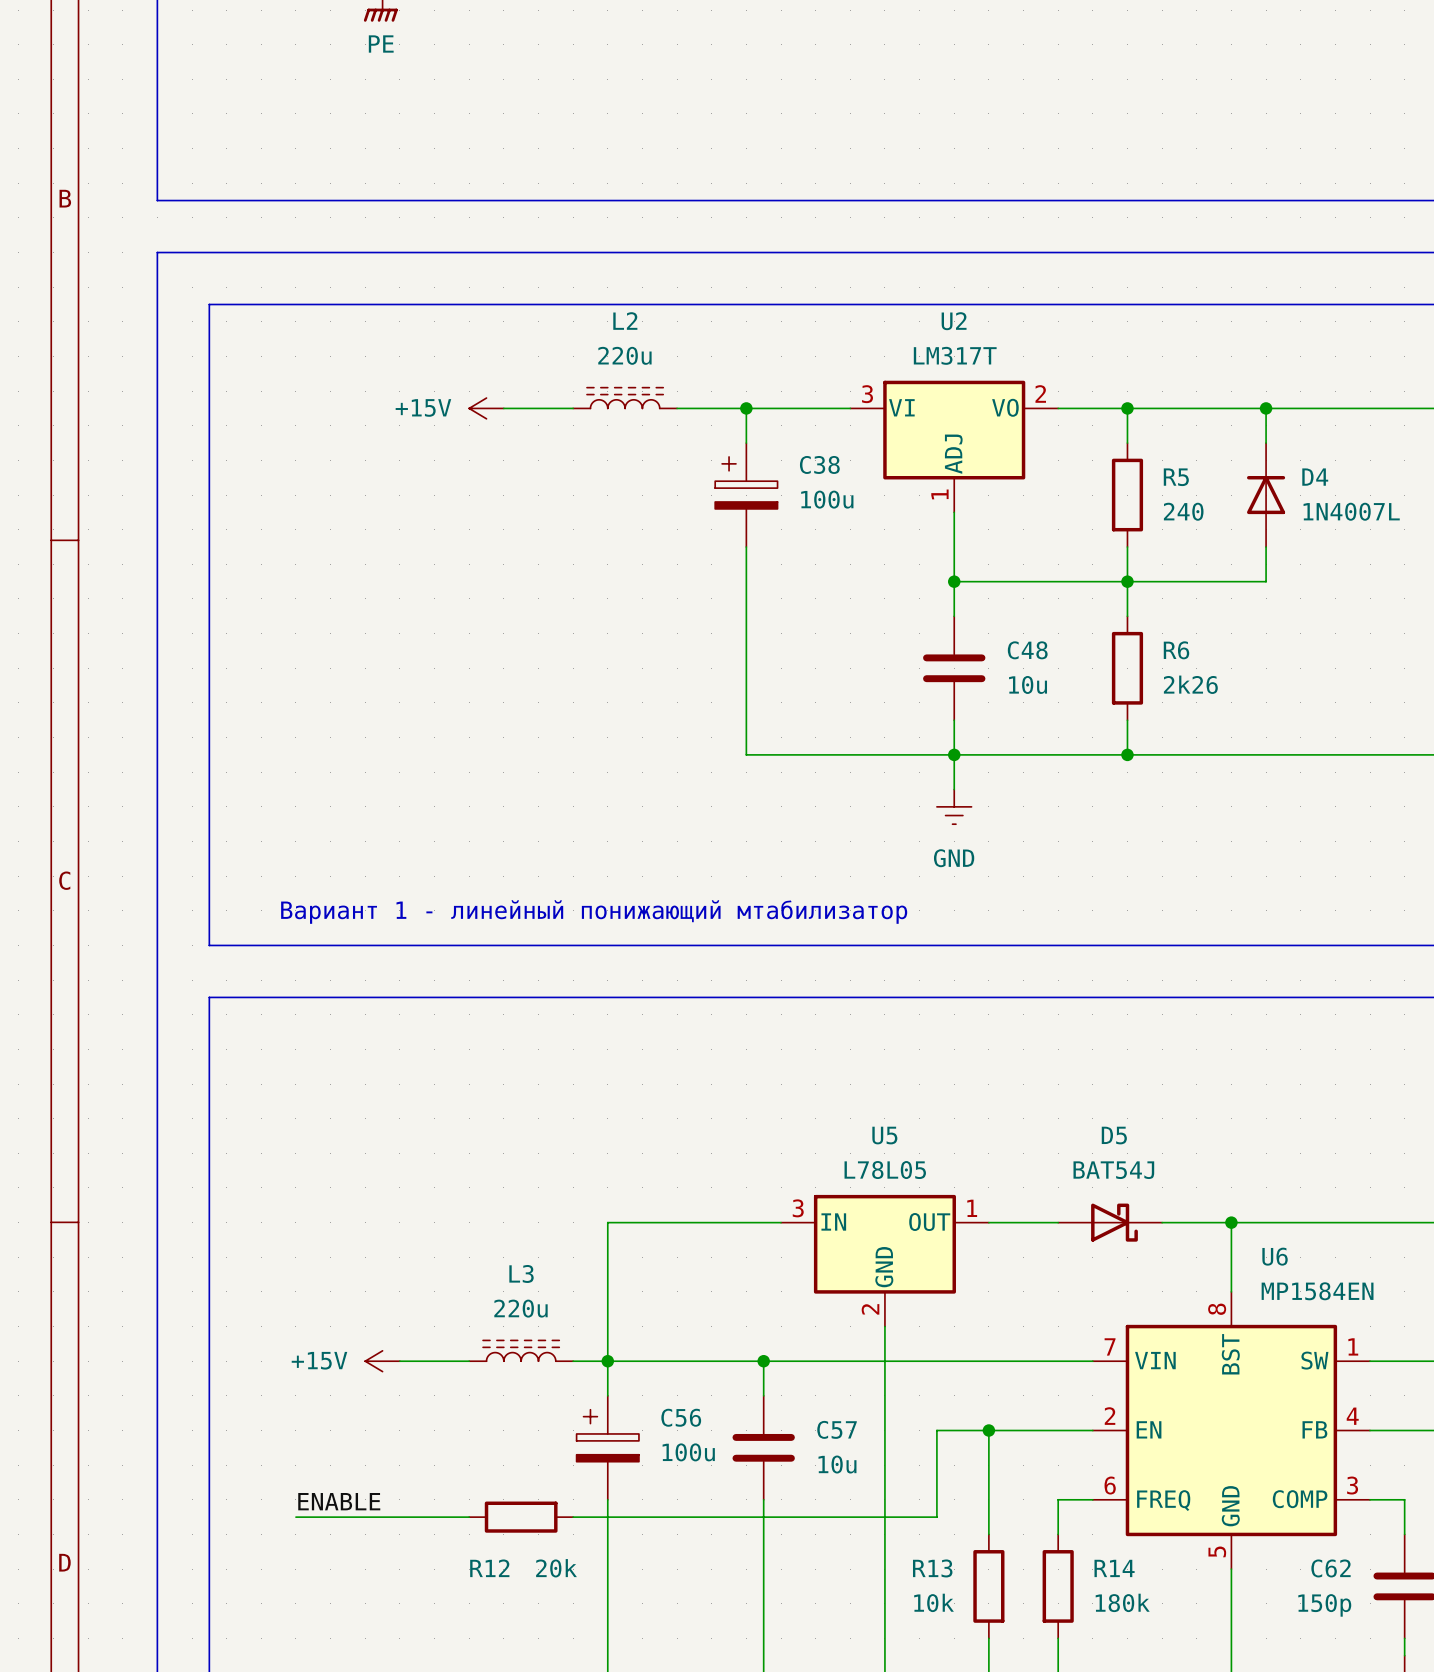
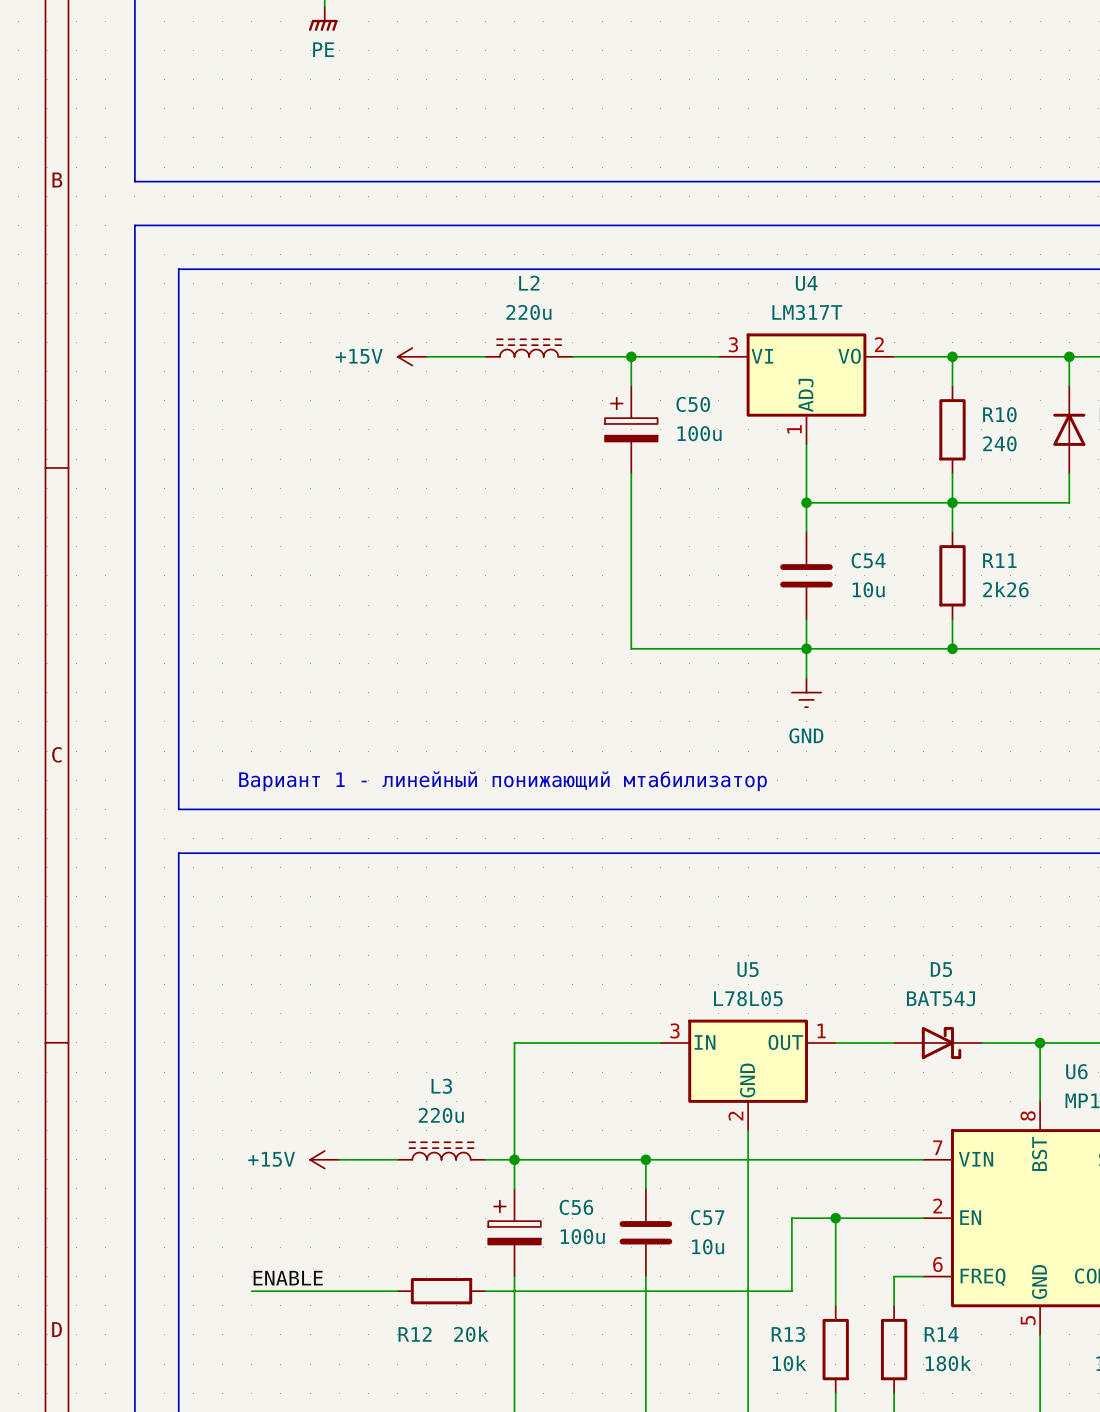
U2 name: U2 (954, 321) -> U4 (806, 283)
C38 name: C38 (819, 464) -> C50 (693, 404)
R5 name: R5 (1176, 477) -> R10 (999, 414)
C48 name: C48 (1027, 650) -> C54 (868, 560)
R6 name: R6 (1176, 650) -> R11 (999, 560)

